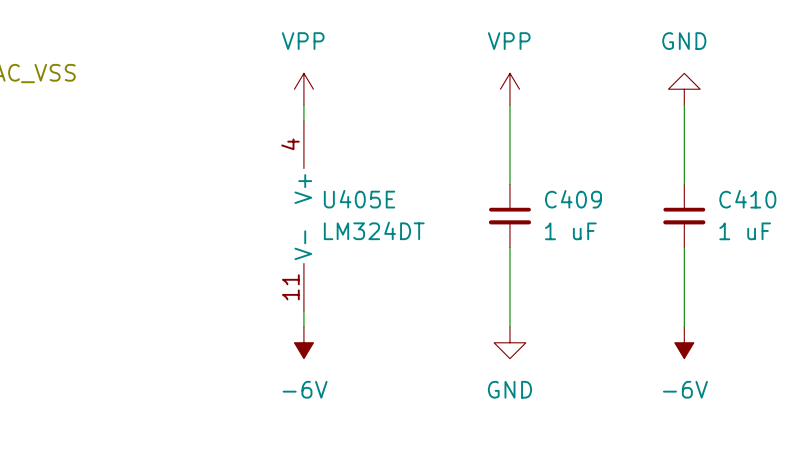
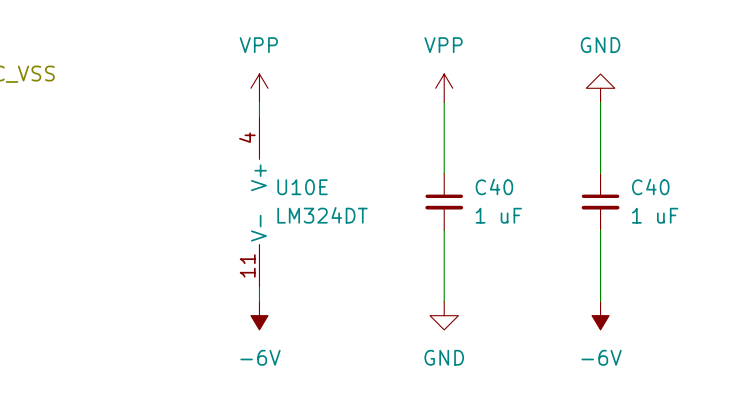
U405E name: U405E (359, 199) -> U10E (302, 187)
C409 name: C409 (573, 199) -> C40 (494, 186)
C410 name: C410 (747, 199) -> C40 (650, 186)

